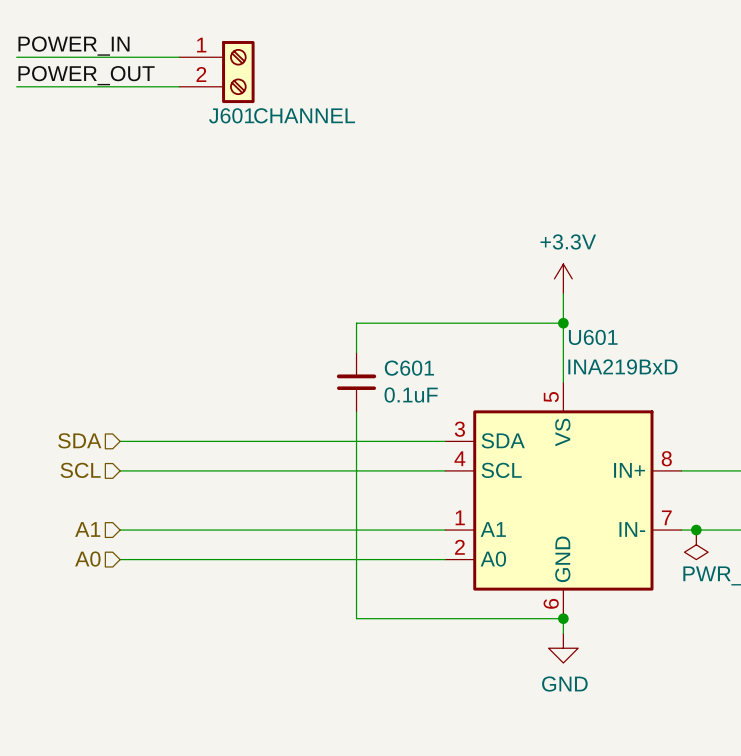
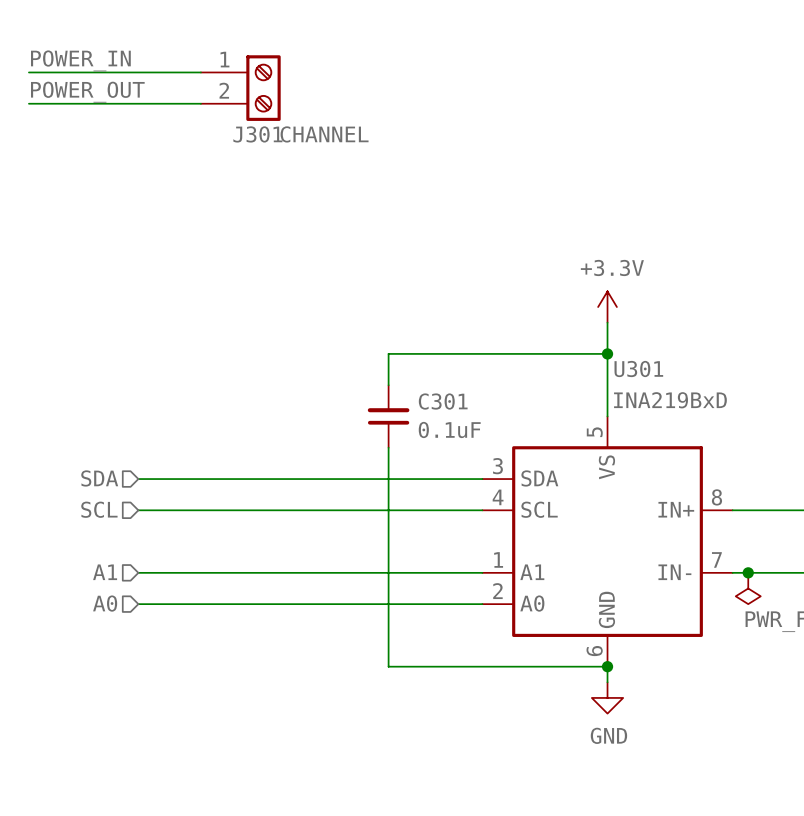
J601 name: J601 (231, 115) -> J301 (257, 134)
U601 name: U601 (593, 337) -> U301 (638, 369)
C601 name: C601 (409, 368) -> C301 (443, 401)

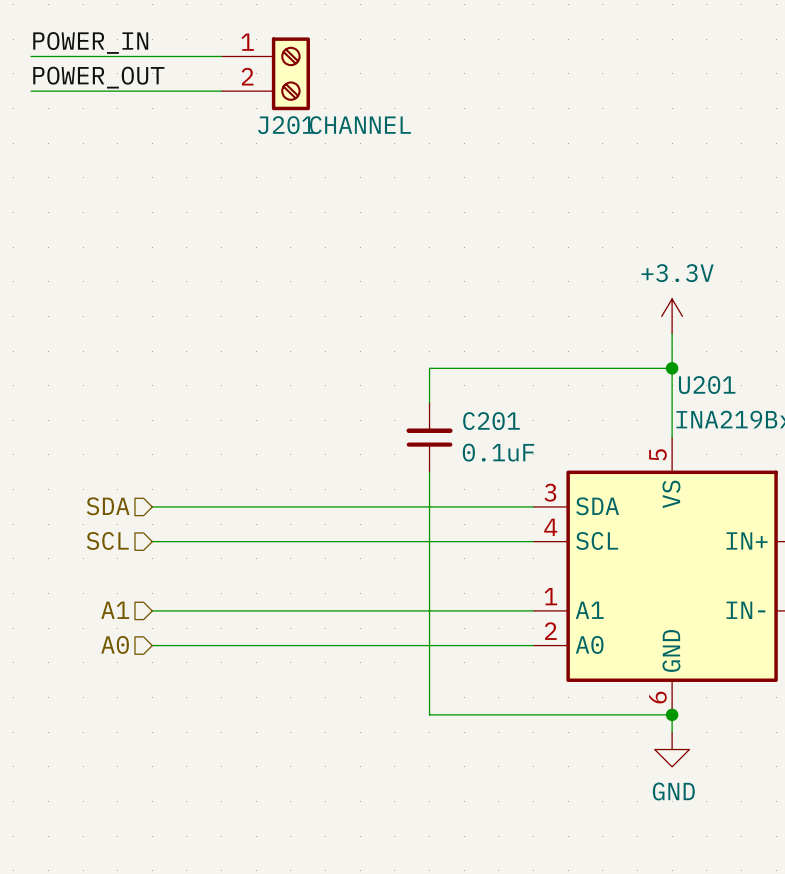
J301 name: J301 (257, 134) -> J201 (286, 125)
U301 name: U301 (638, 369) -> U201 (707, 385)
C301 name: C301 (443, 401) -> C201 (491, 421)

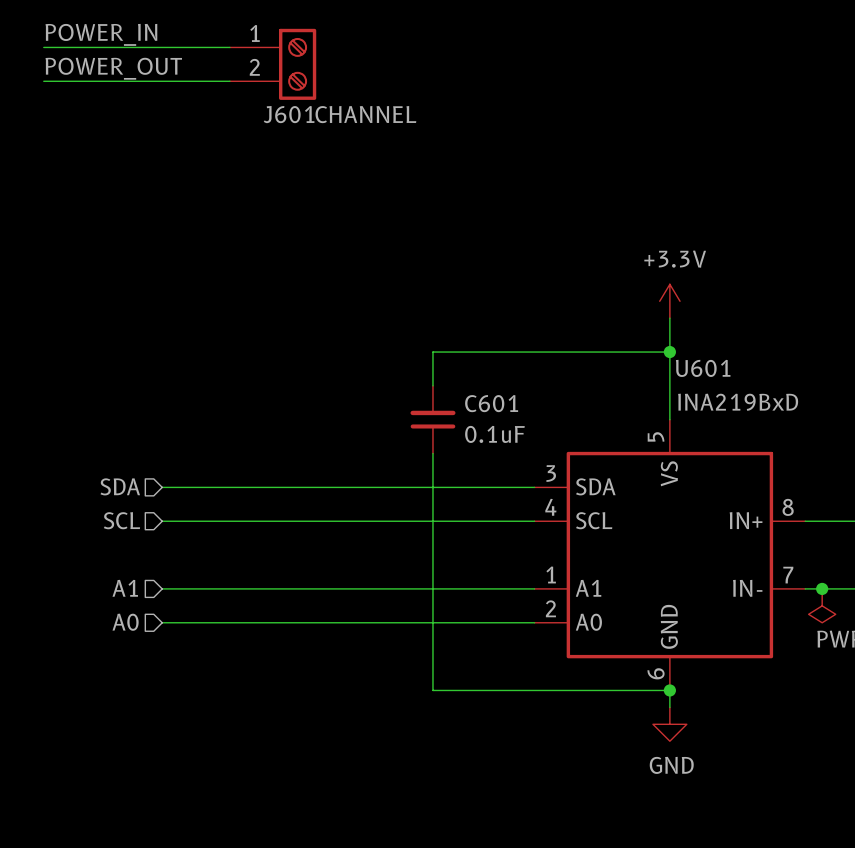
J201 name: J201 (286, 125) -> J601 (289, 114)
U201 name: U201 (707, 385) -> U601 (703, 368)
C201 name: C201 (491, 421) -> C601 (491, 403)

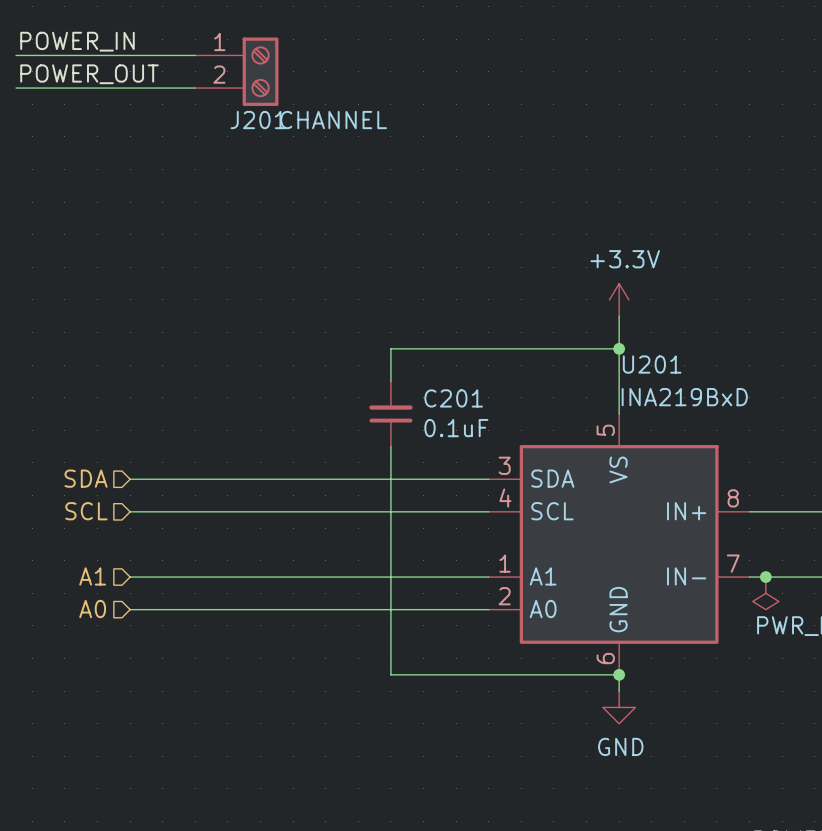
J601 name: J601 (289, 114) -> J201 (258, 120)
U601 name: U601 (703, 368) -> U201 (652, 364)
C601 name: C601 (491, 403) -> C201 (453, 398)

